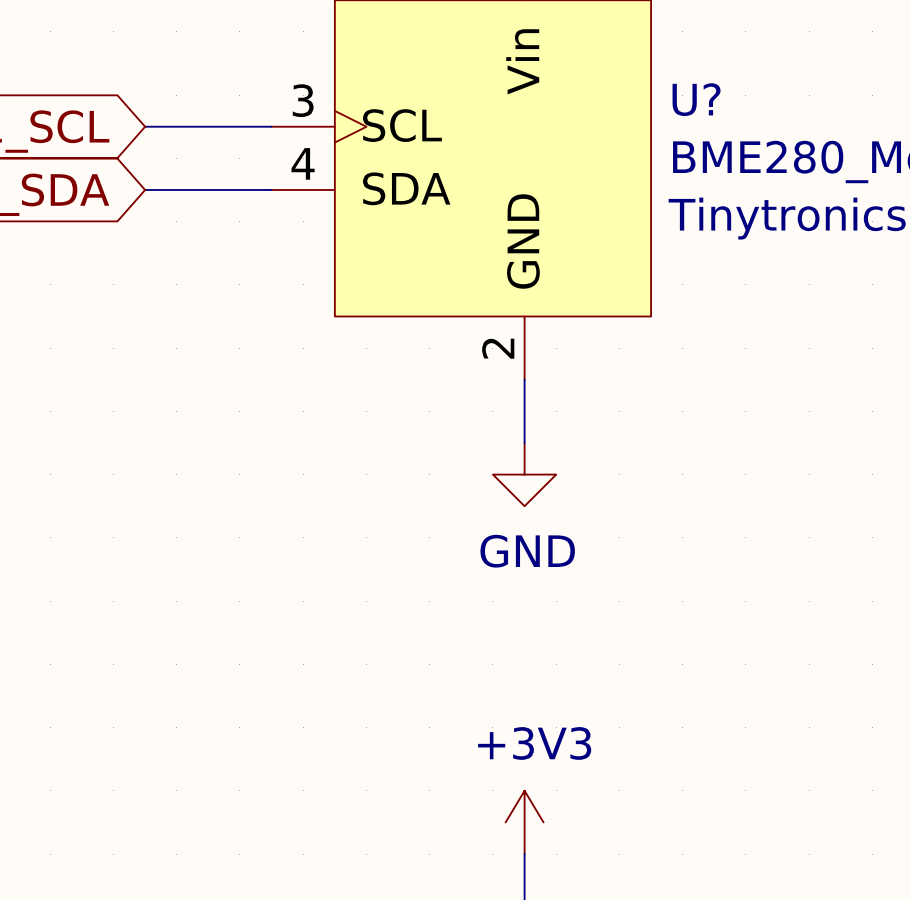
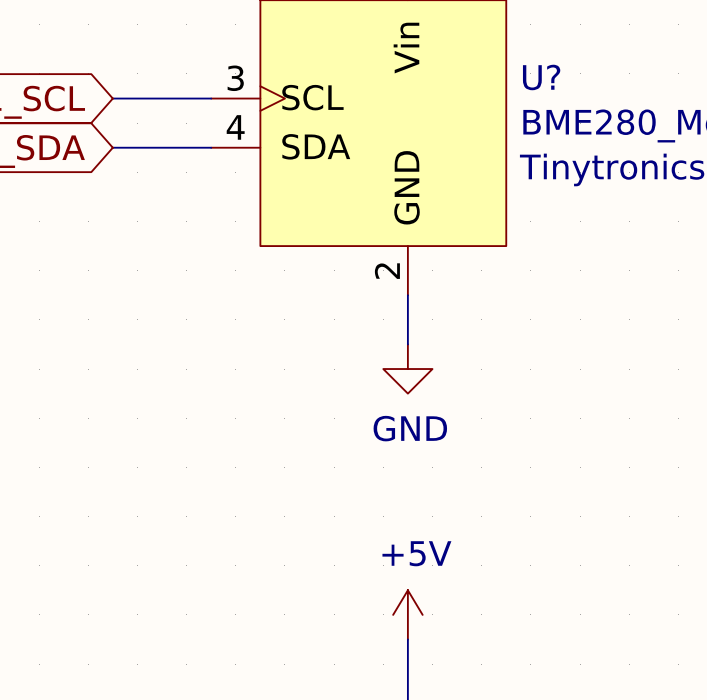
power symbol: none -> +5V (407, 614)
power symbol: +3V3 (524, 822) -> none

